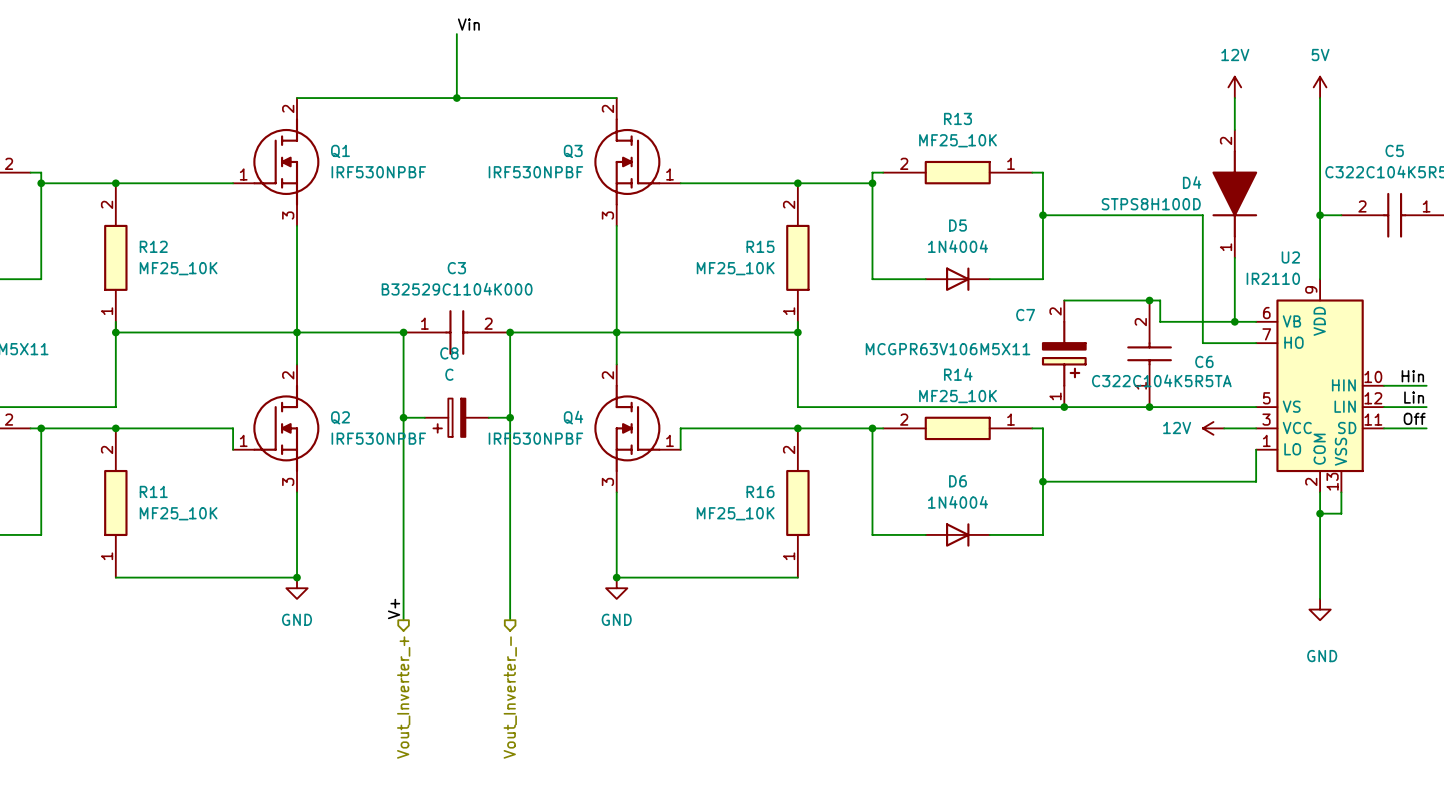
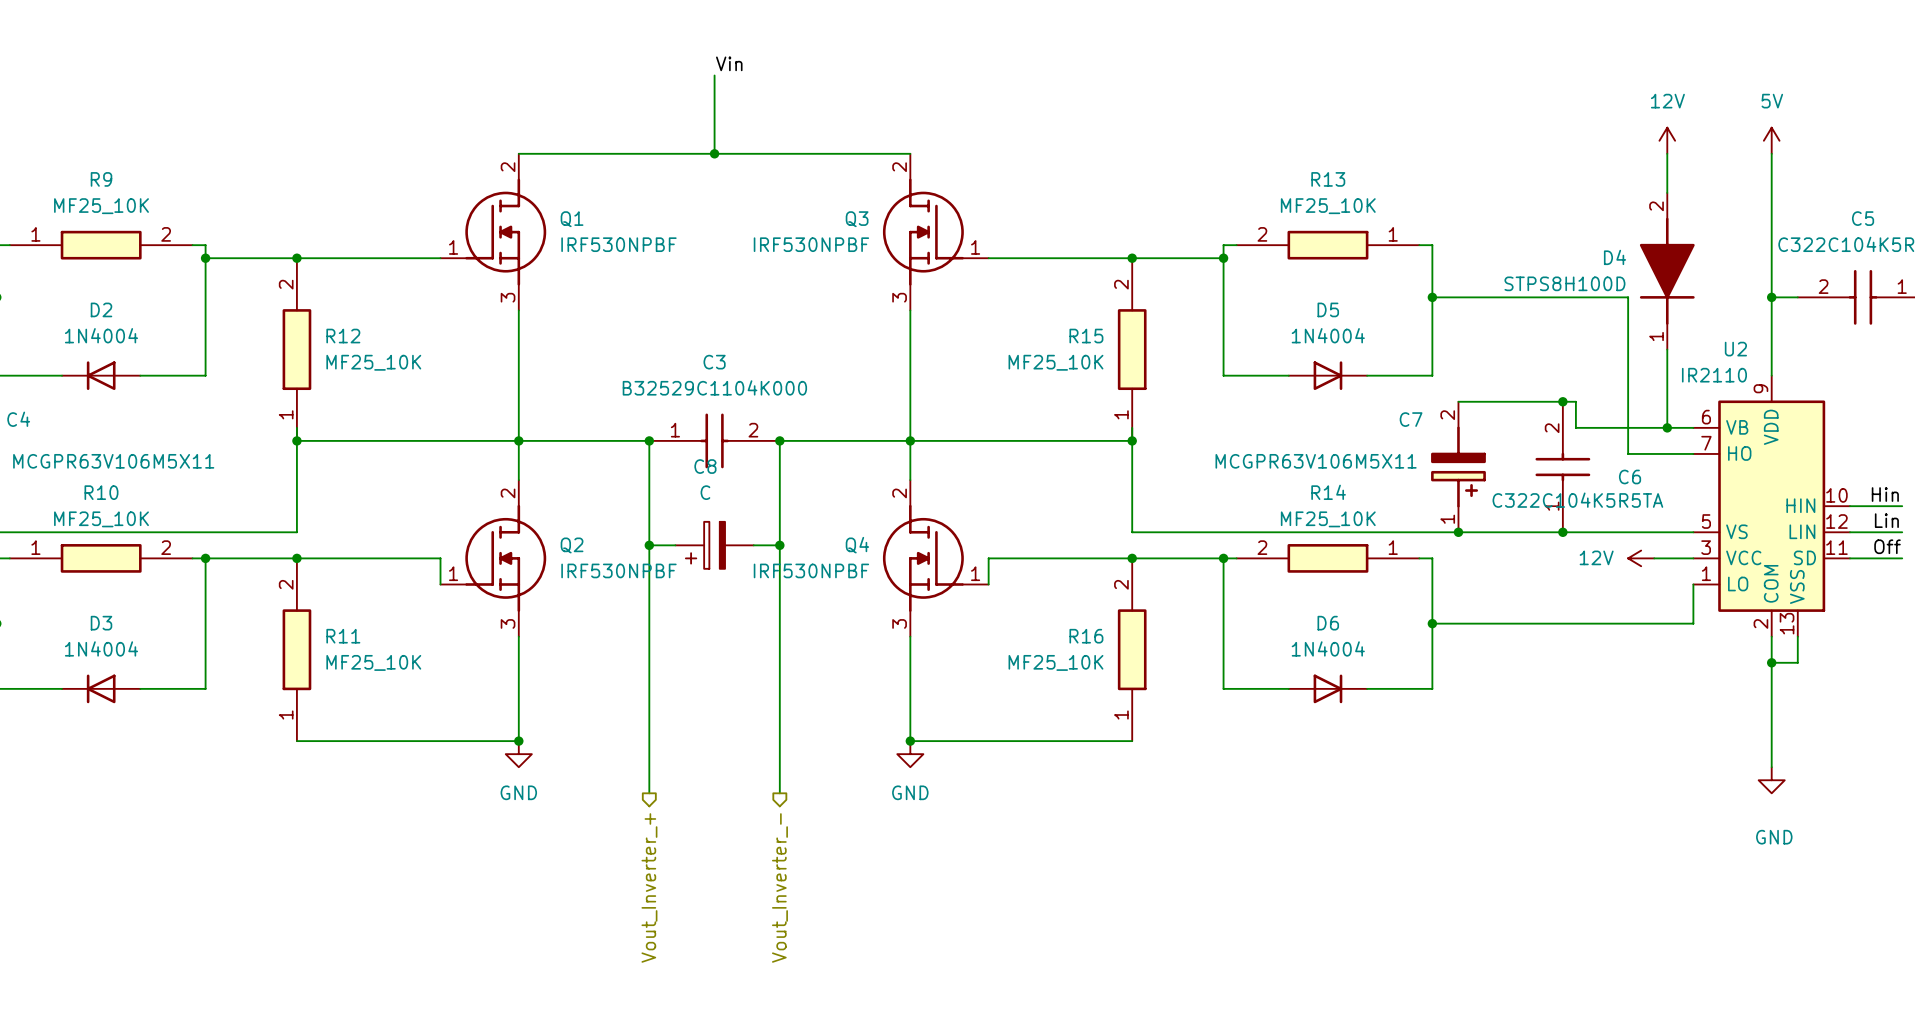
label: V+ (394, 608) -> none

